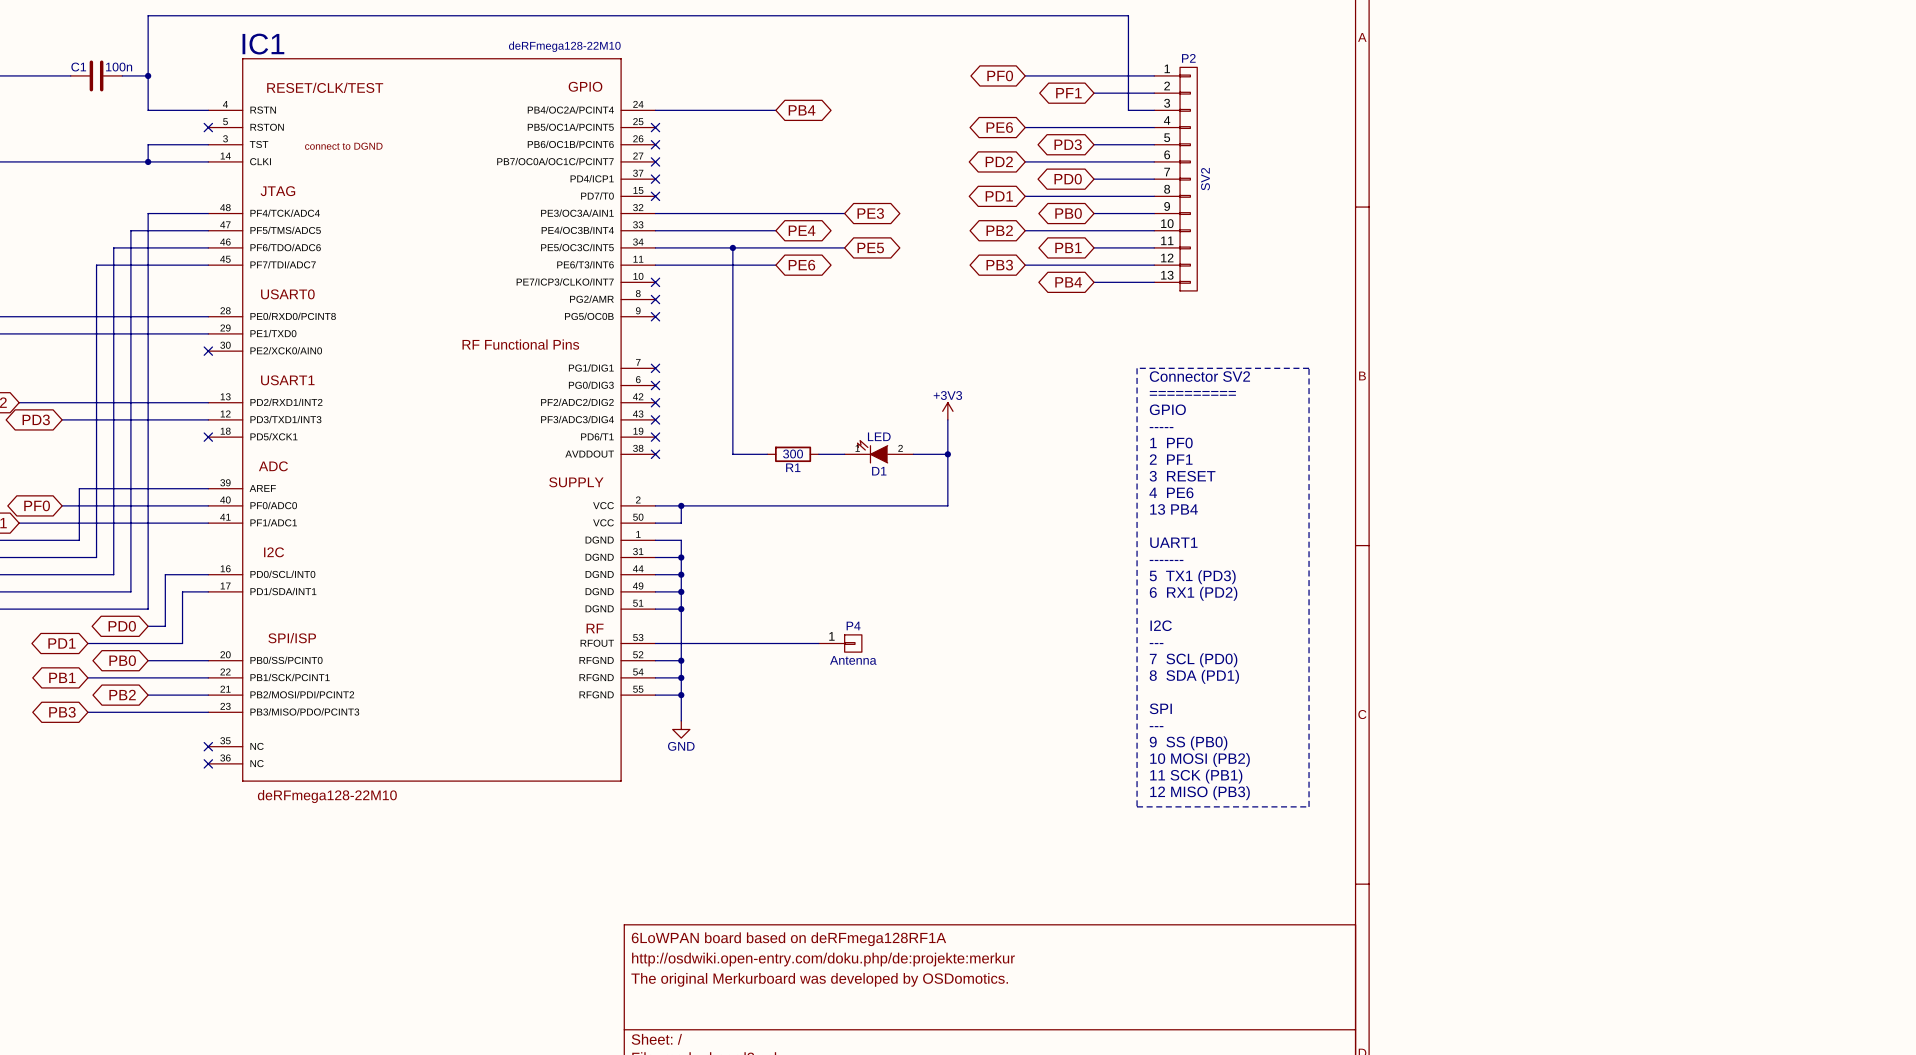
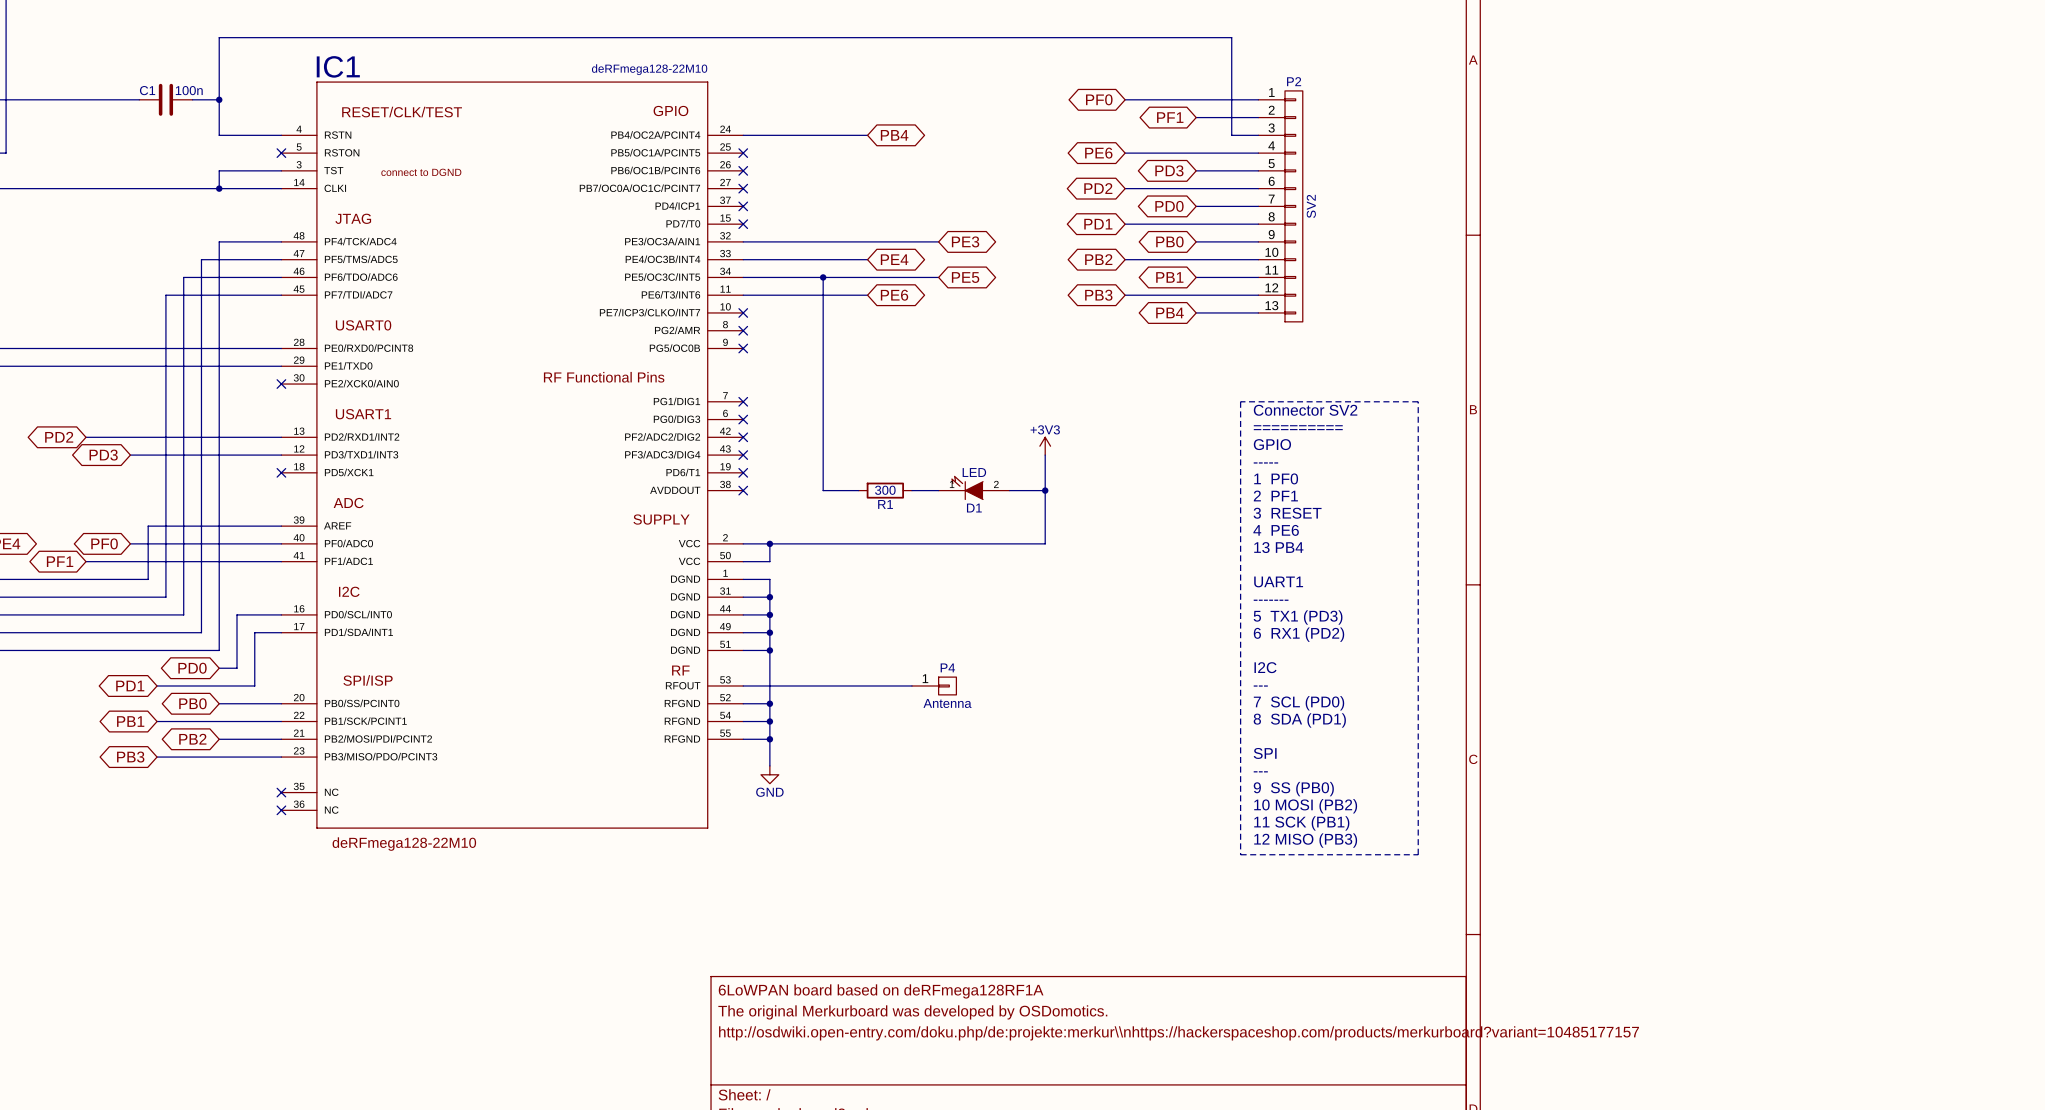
title block: http://osdwiki.open-entry.com/doku.php/de:projekte:merkur (823, 959) -> The original Merkurboard was developed by OSDomotics. (912, 1012)
title block: The original Merkurboard was developed by OSDomotics. (819, 979) -> http://osdwiki.open-entry.com/doku.php/de:projekte:merkur\\nhttps://hackerspaceshop.com/products/merkurboard?variant=10485177157 (1179, 1033)

